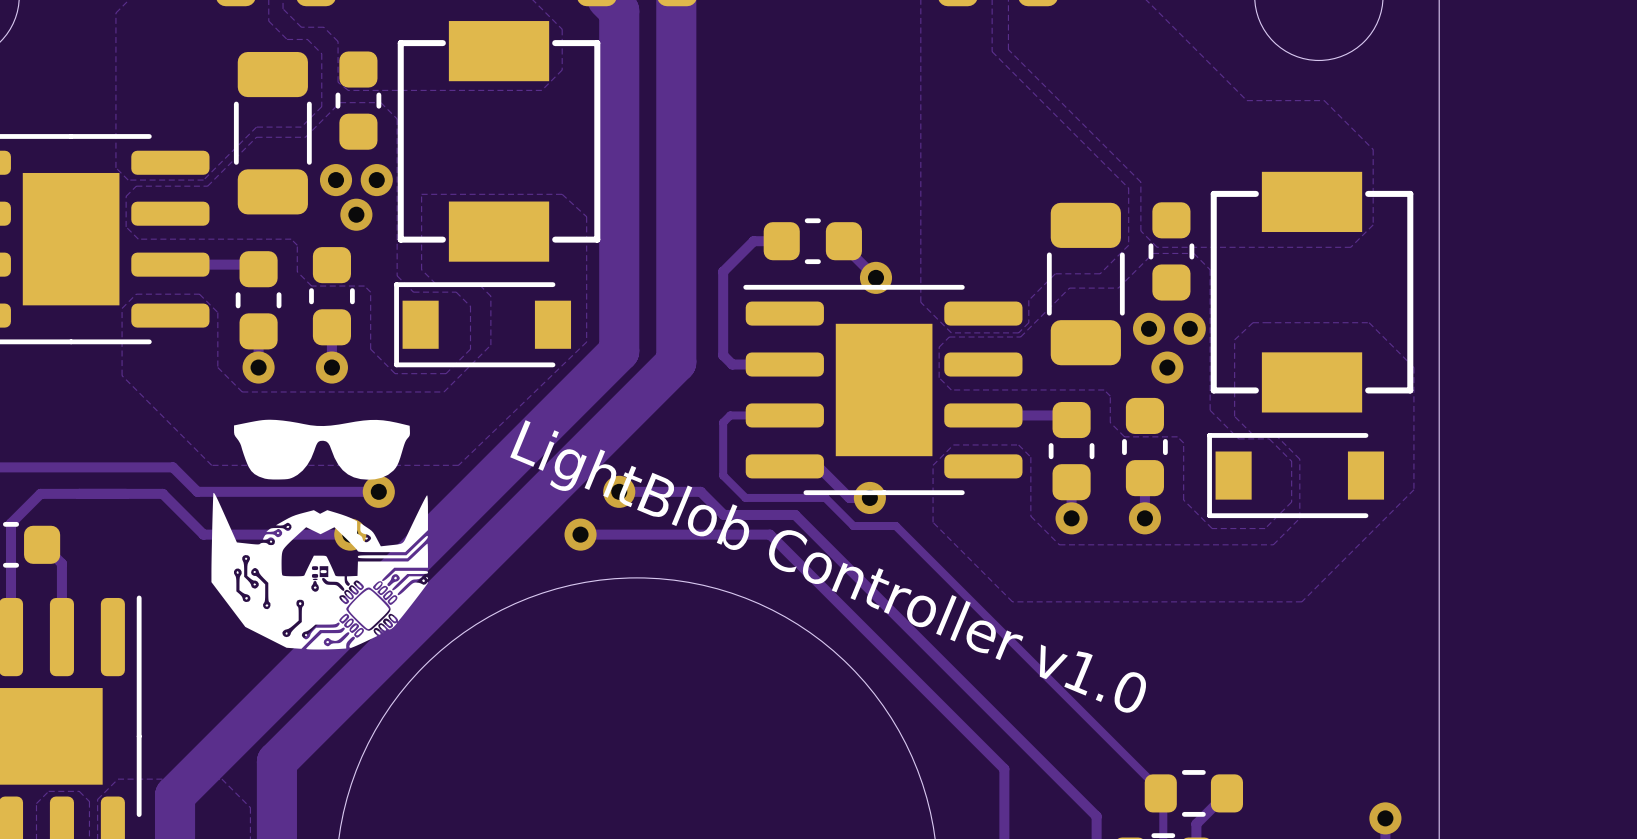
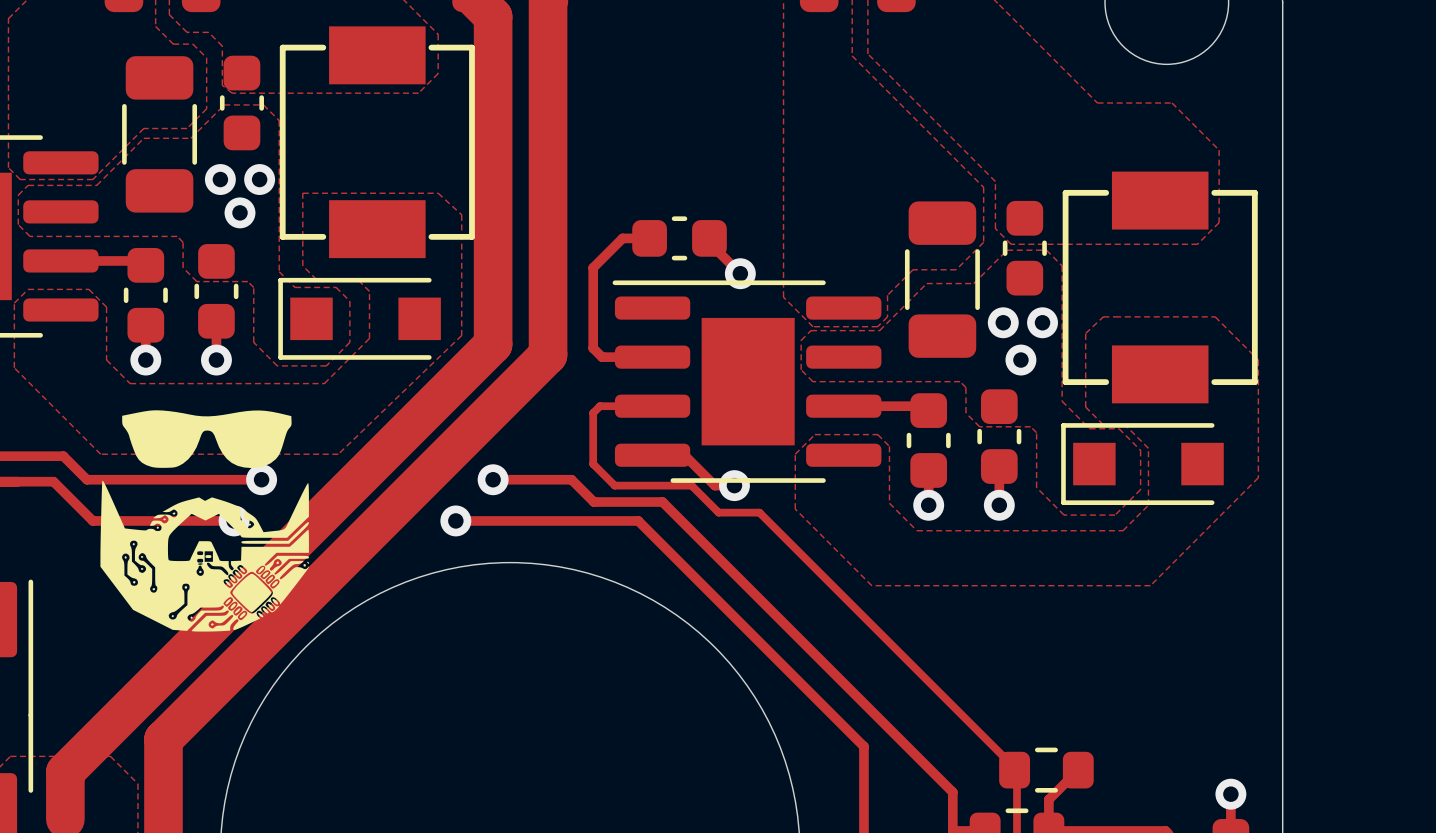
part footprint: [394, 282, 572, 368] -> [278, 277, 441, 360]
part footprint: [1207, 433, 1385, 519] -> [1061, 423, 1224, 506]
text: LightBlob Controller v1.0 (828, 567) -> none

